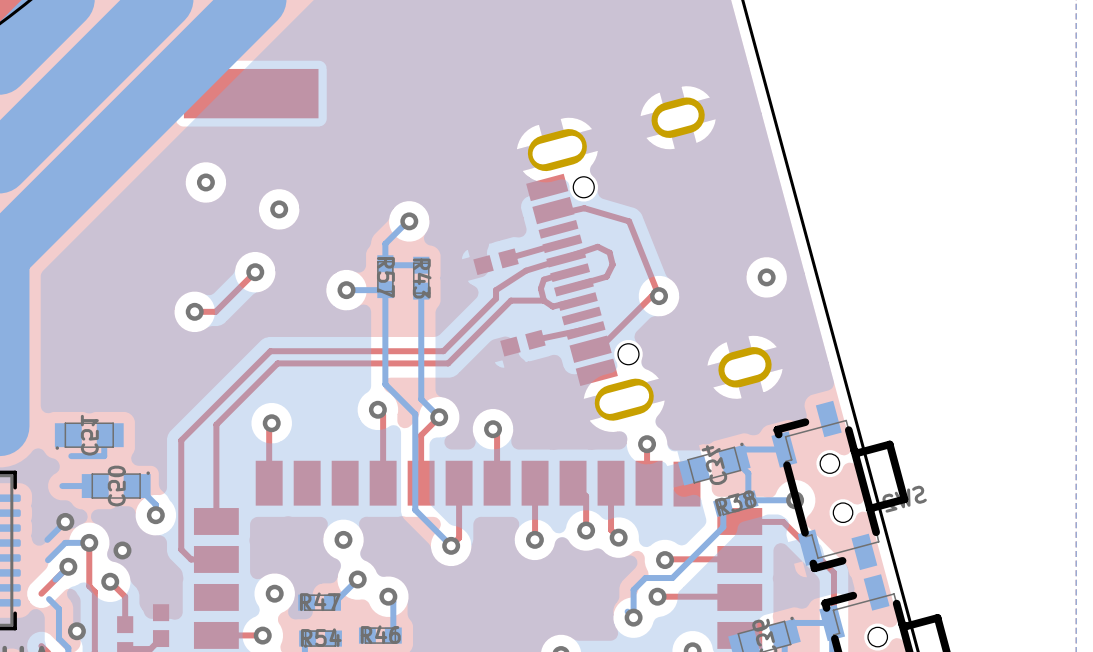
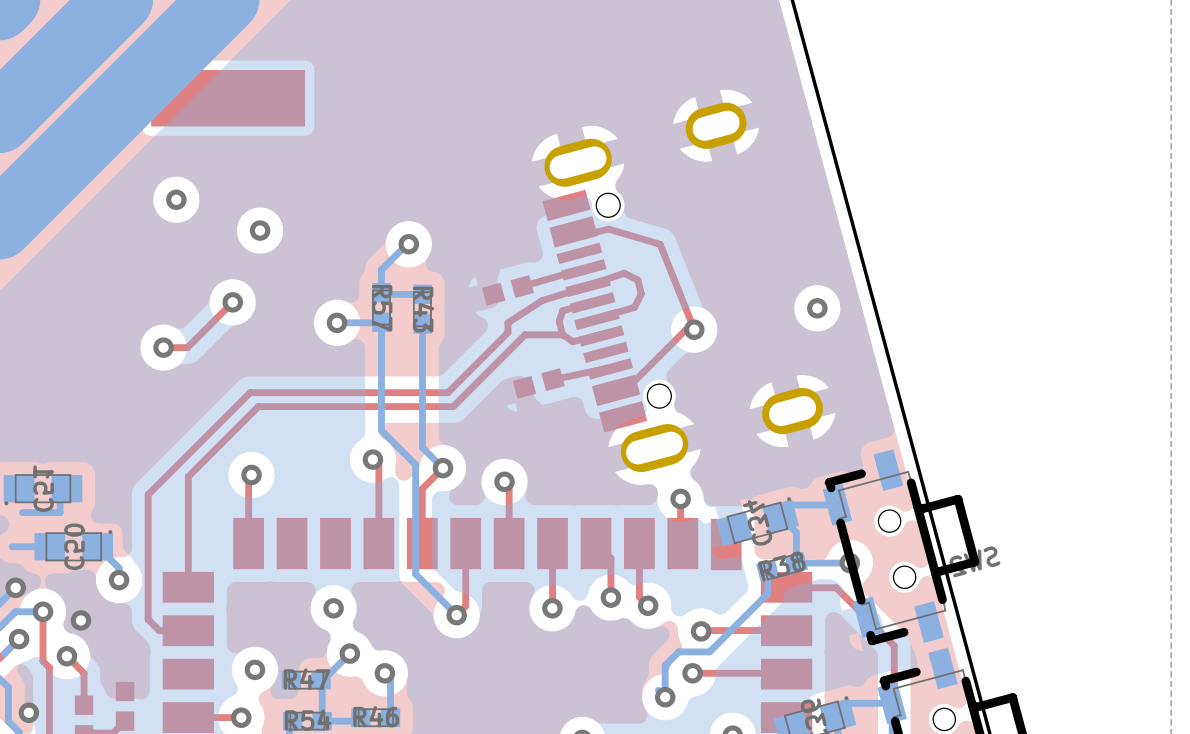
bottom track: none -> (322, 681) (322, 721) (357, 721)

